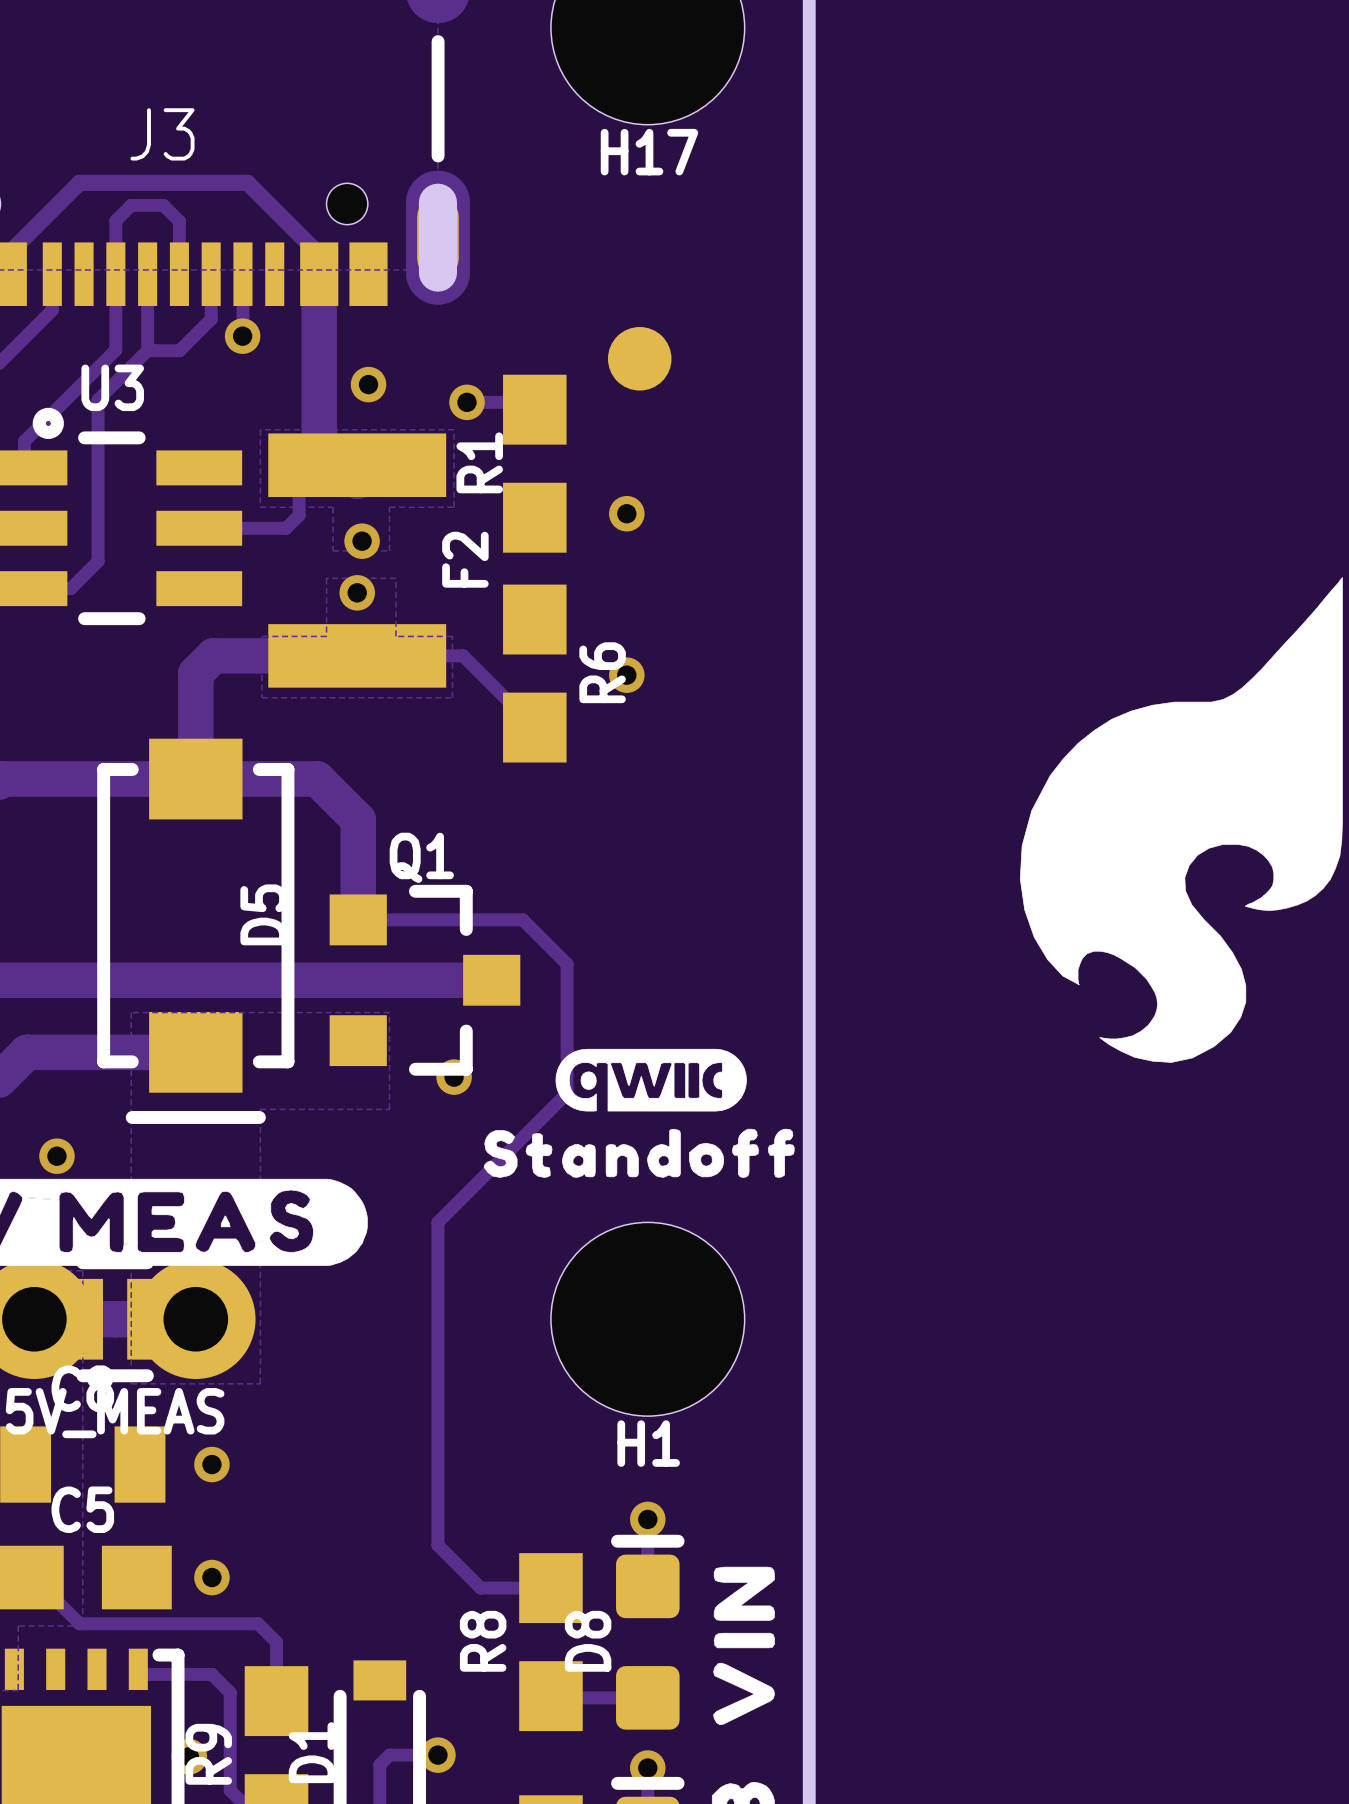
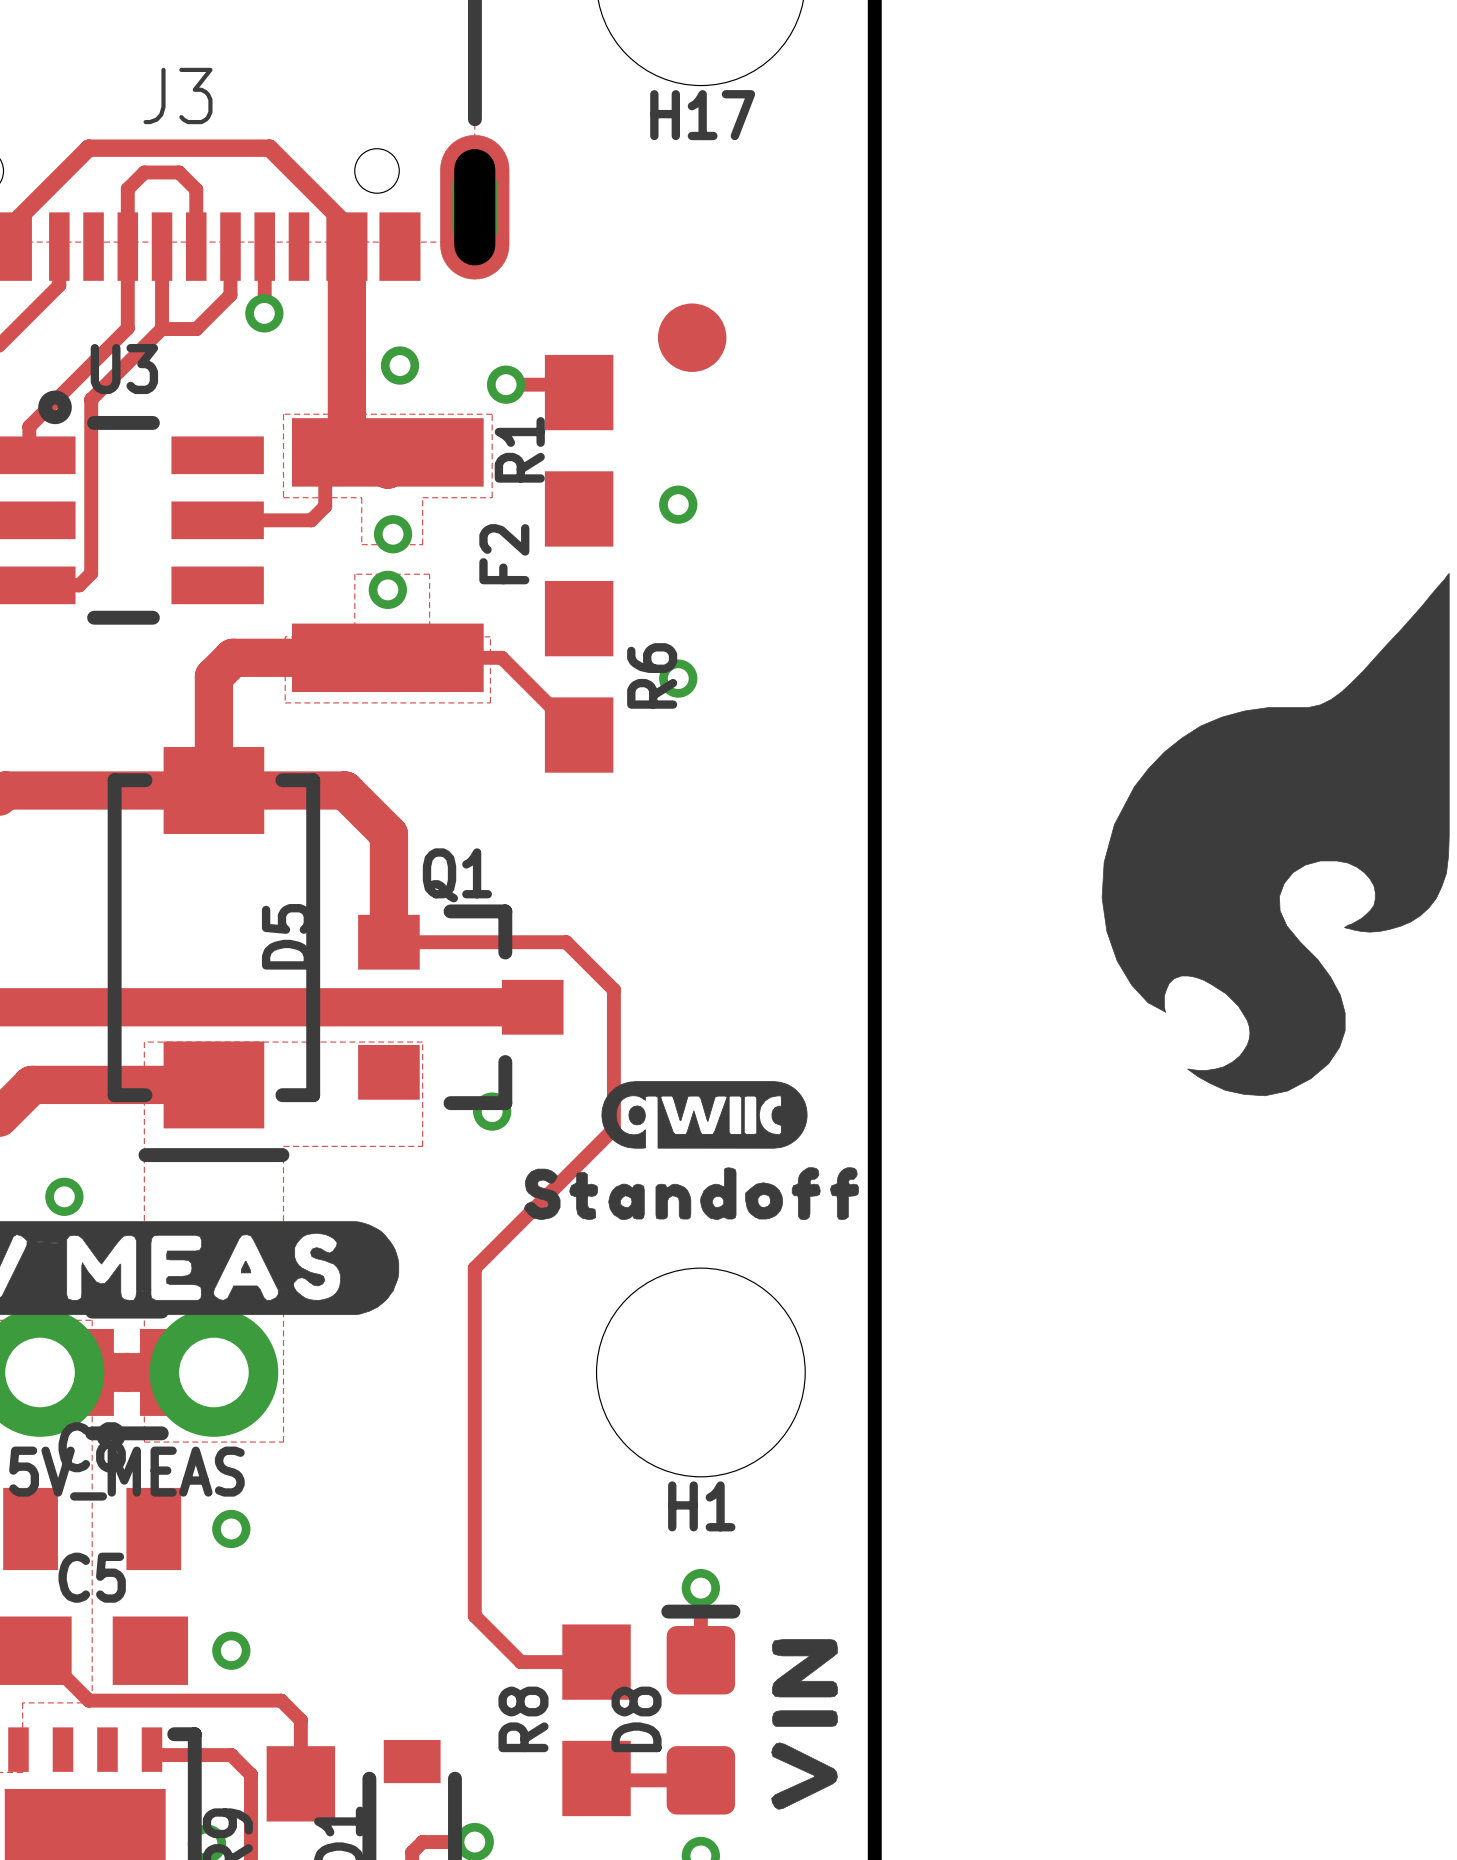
track: (98, 400) (98, 561) (81, 577) -> (108, 382) (91, 399) (91, 573)

